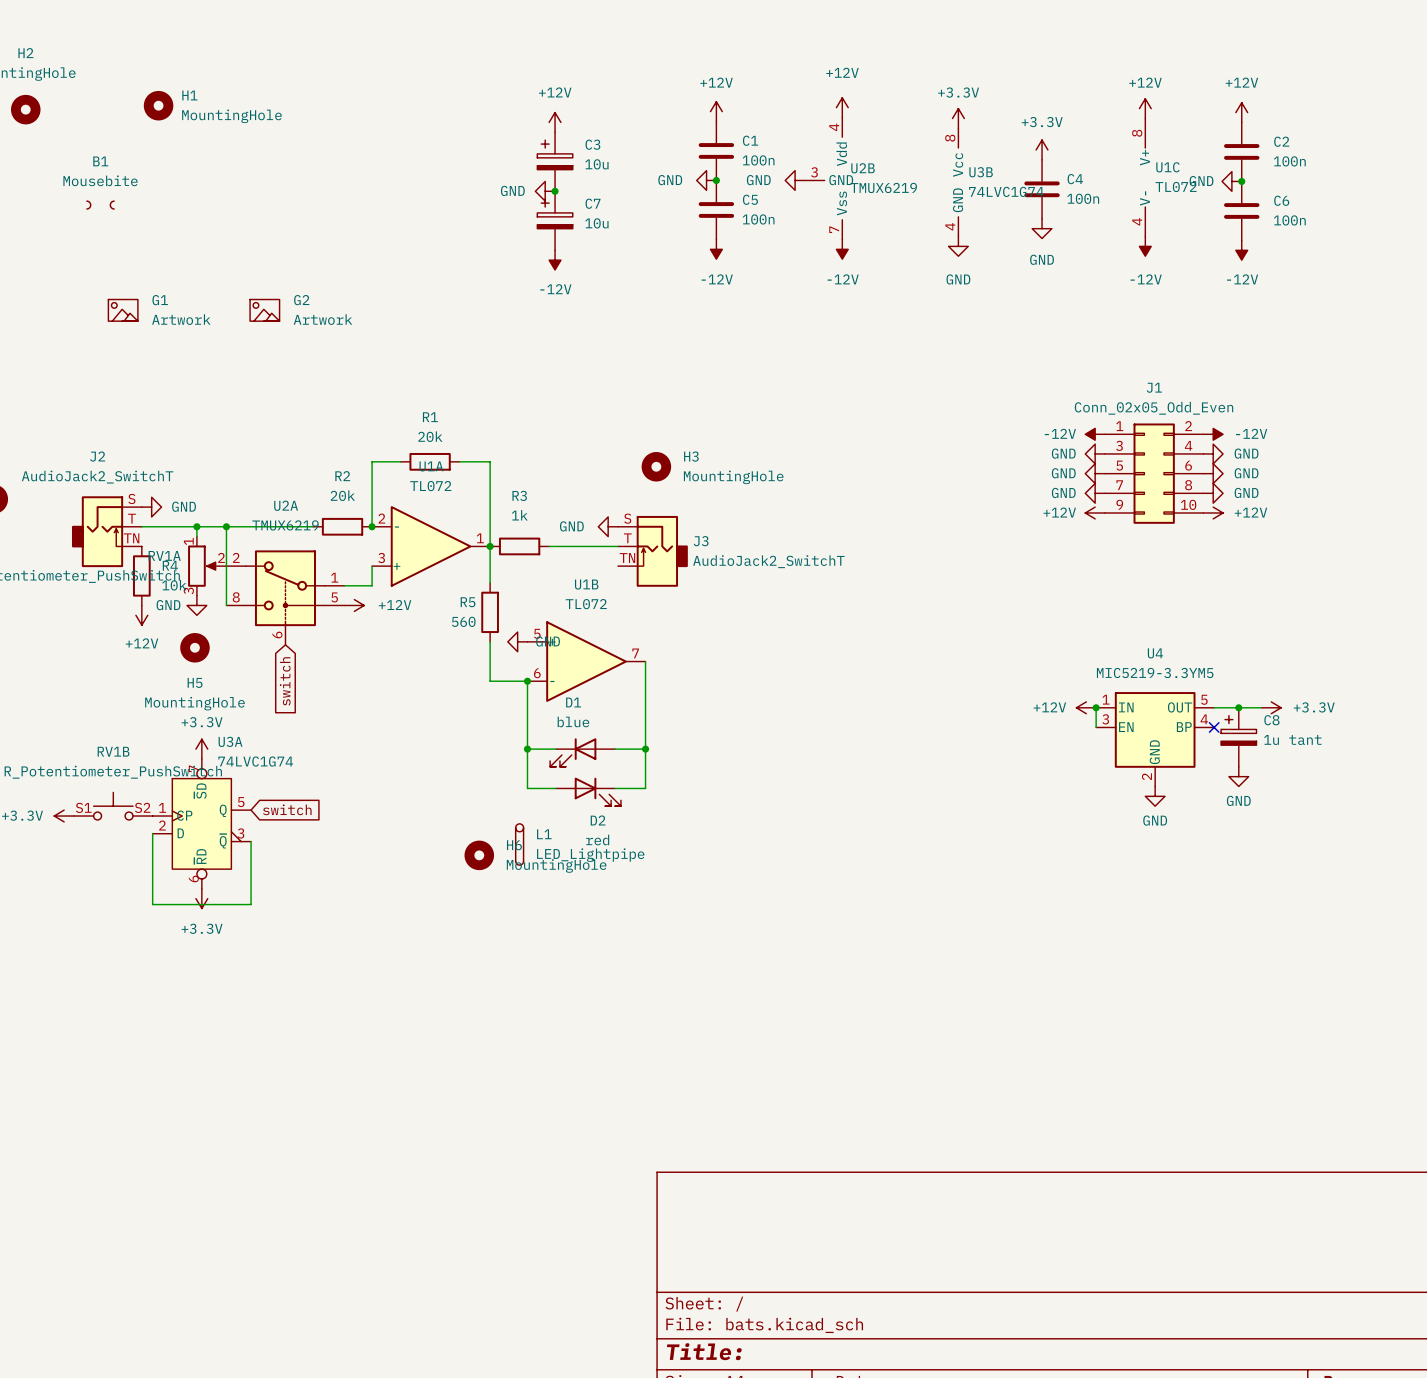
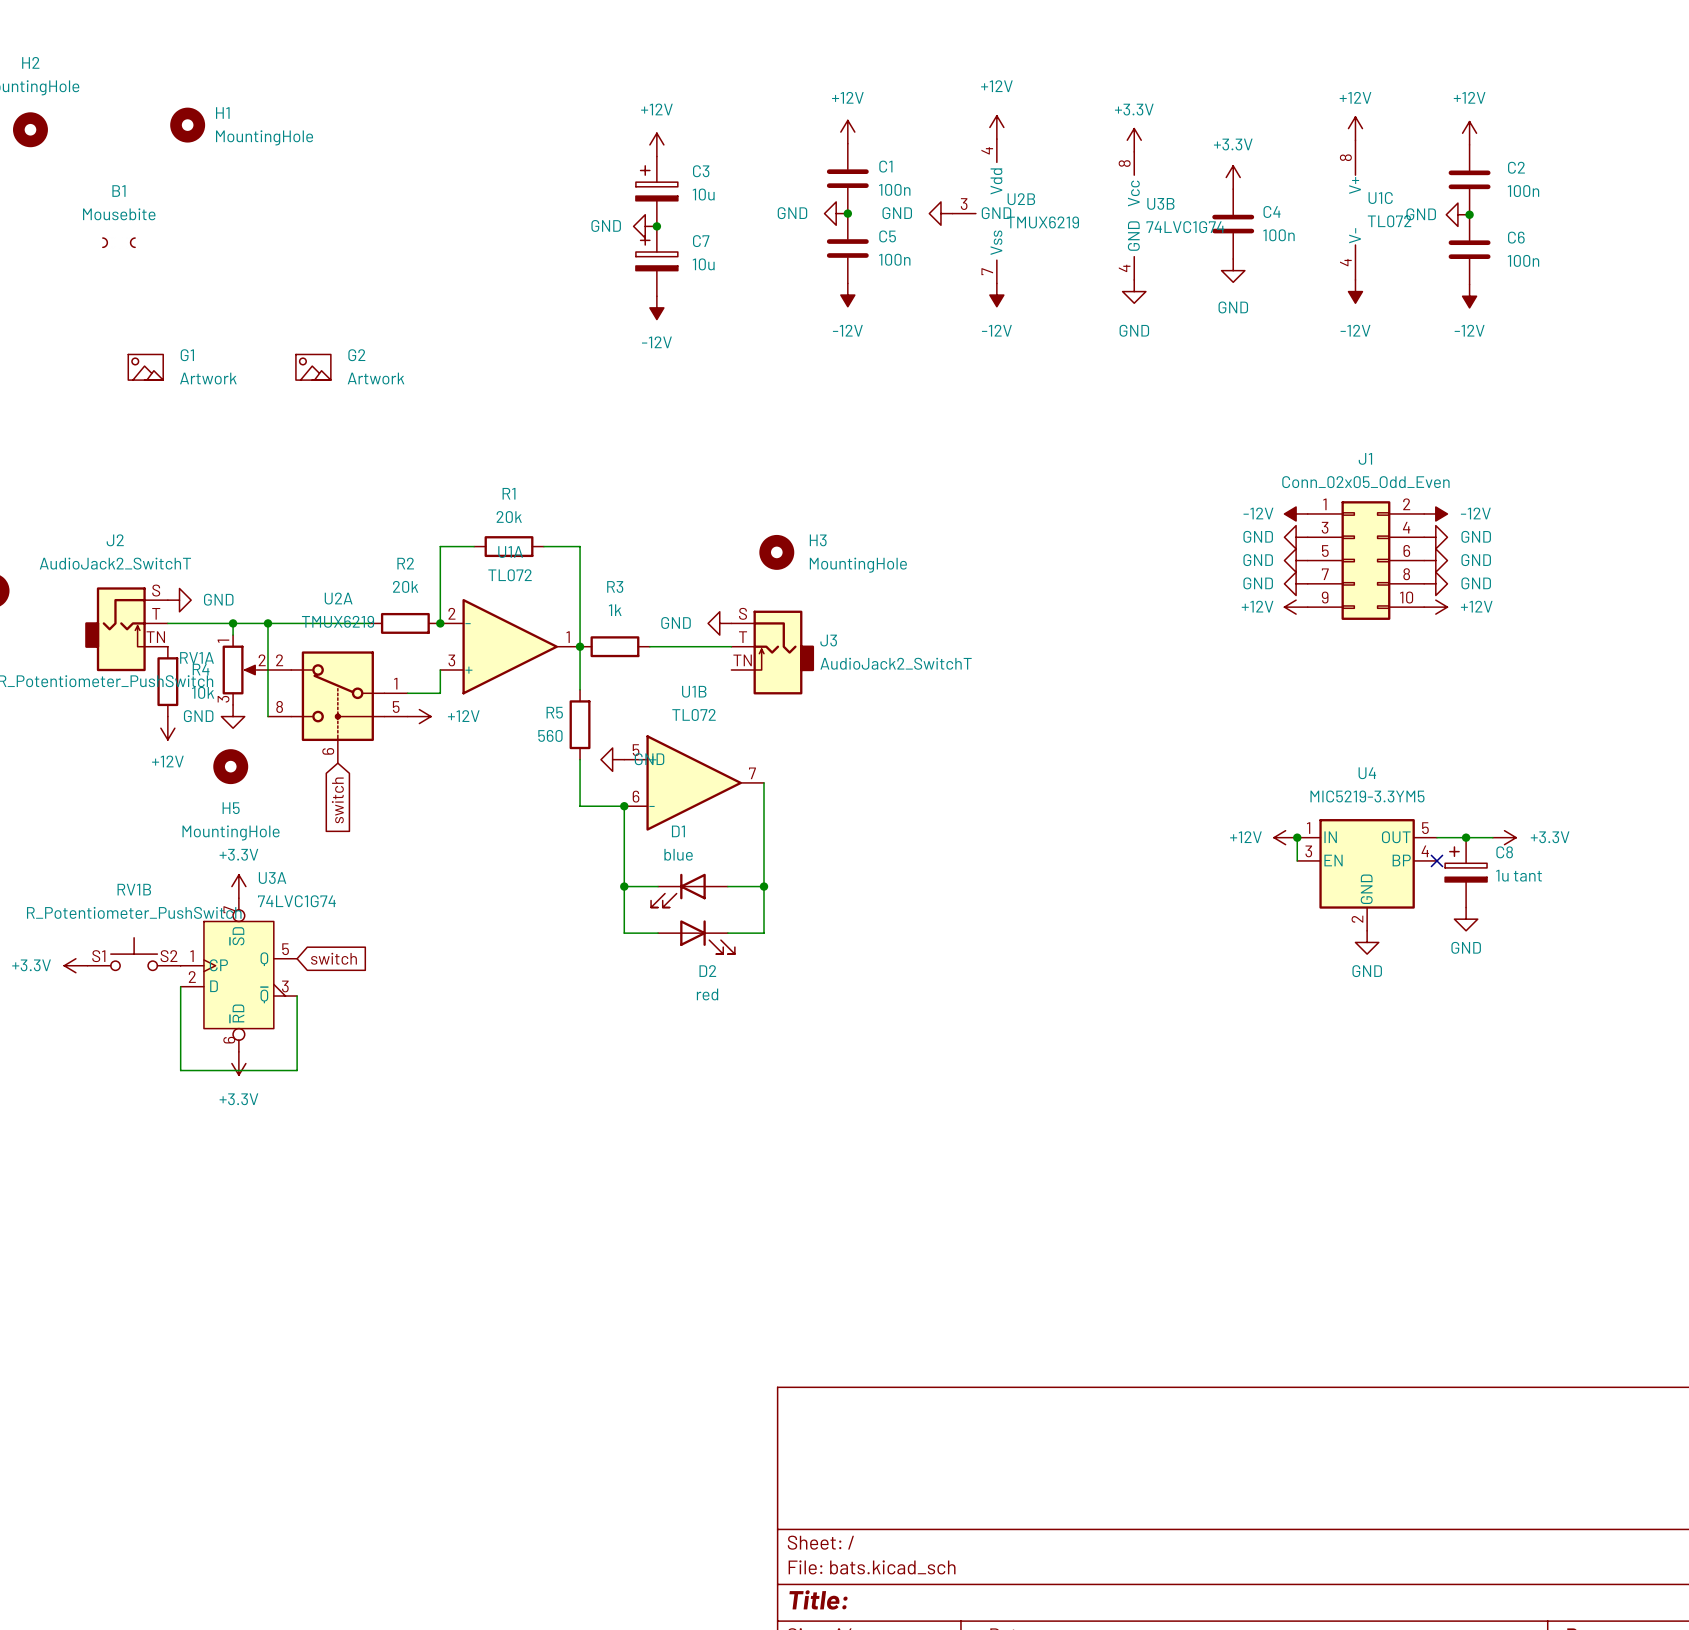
L1: LED_Lightpipe (519, 844) -> none
H6: MountingHole (479, 855) -> none

